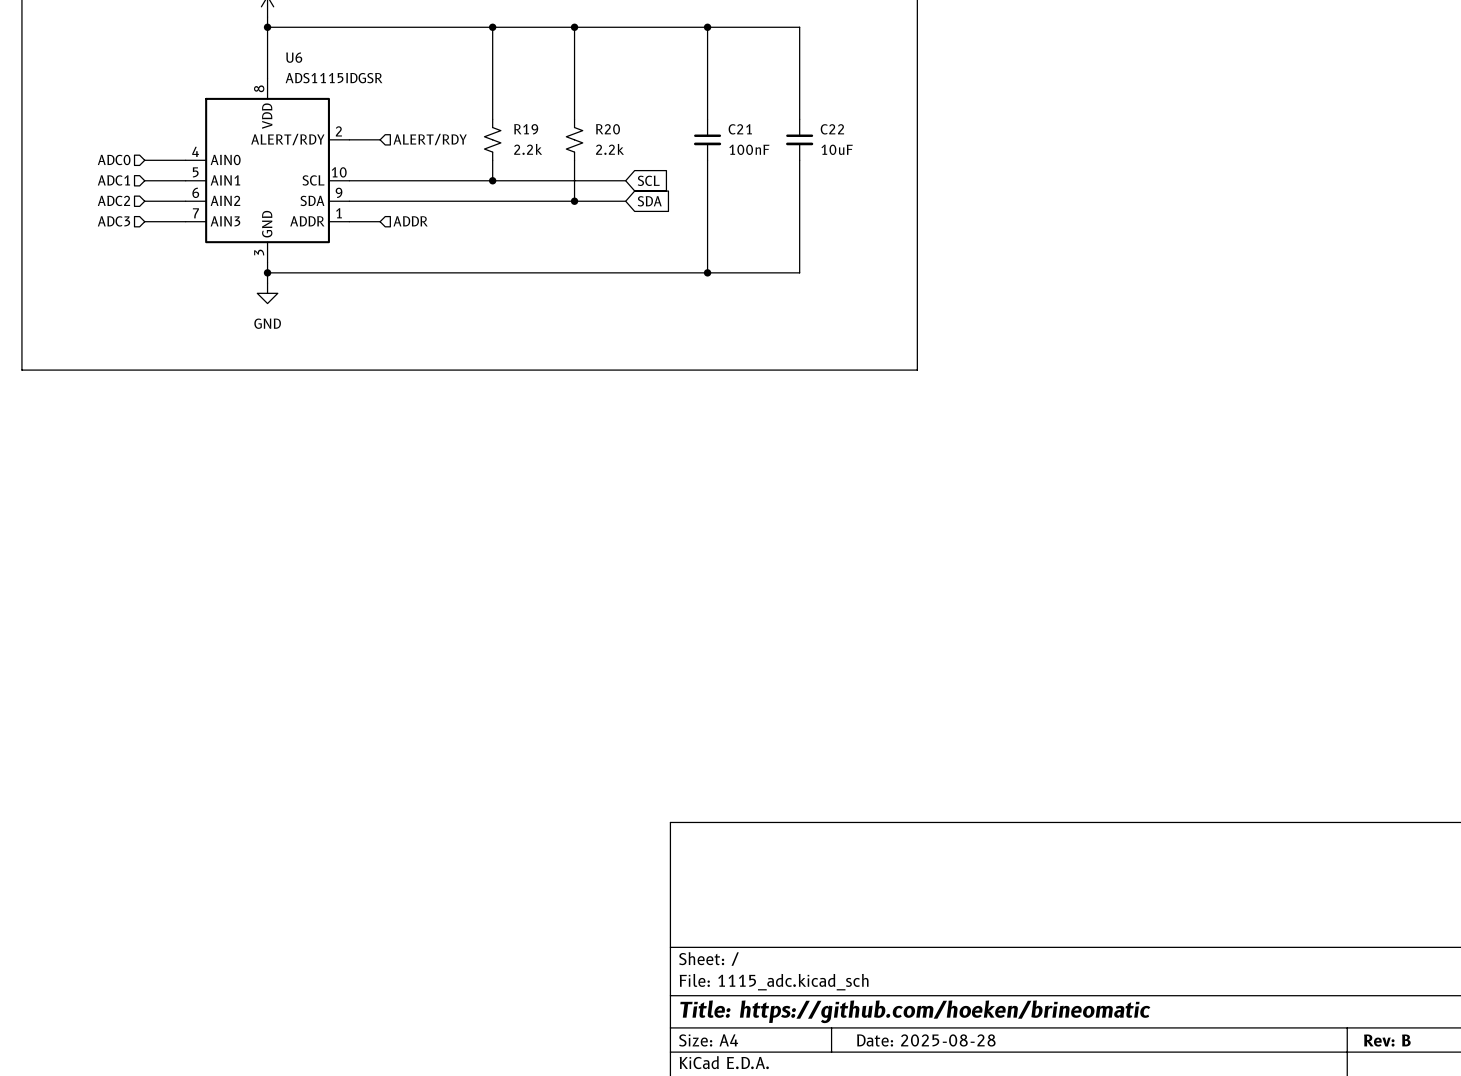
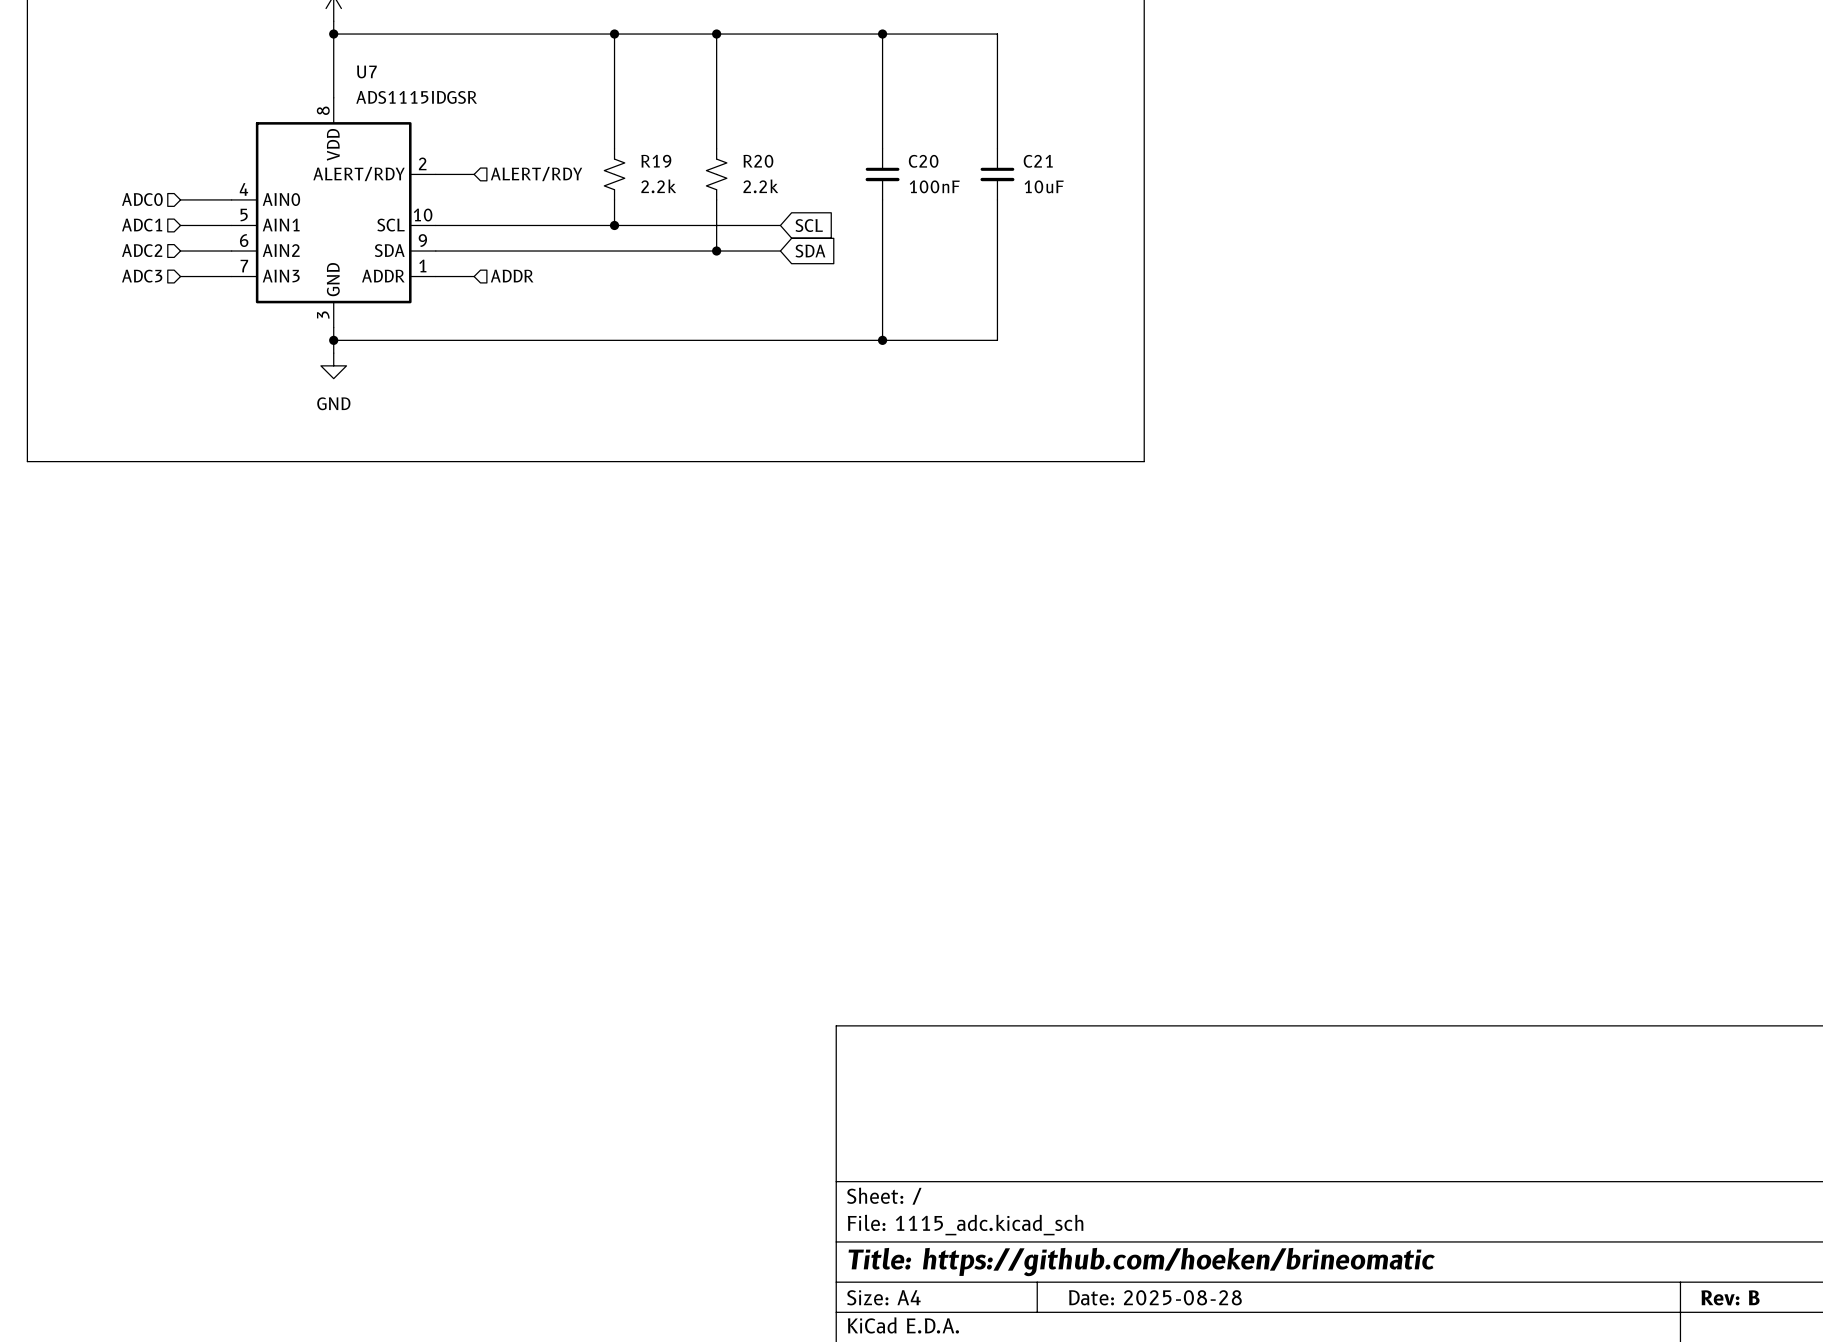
U6 name: U6 (294, 57) -> U7 (366, 71)
C21 name: C21 (740, 129) -> C20 (923, 161)
C22 name: C22 (832, 129) -> C21 (1038, 161)

